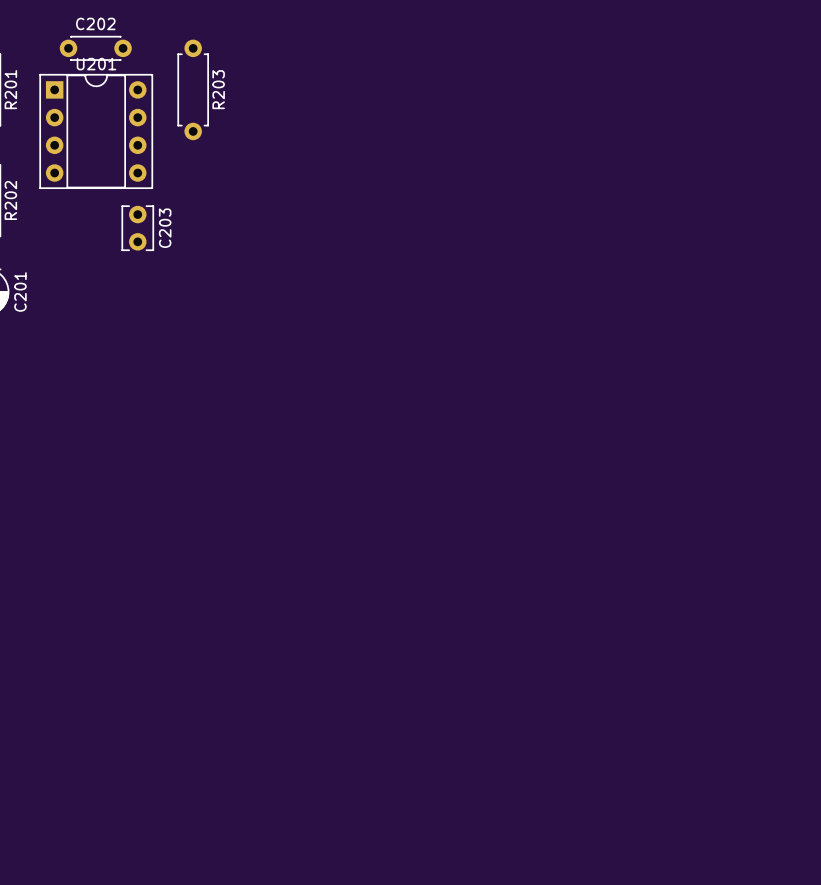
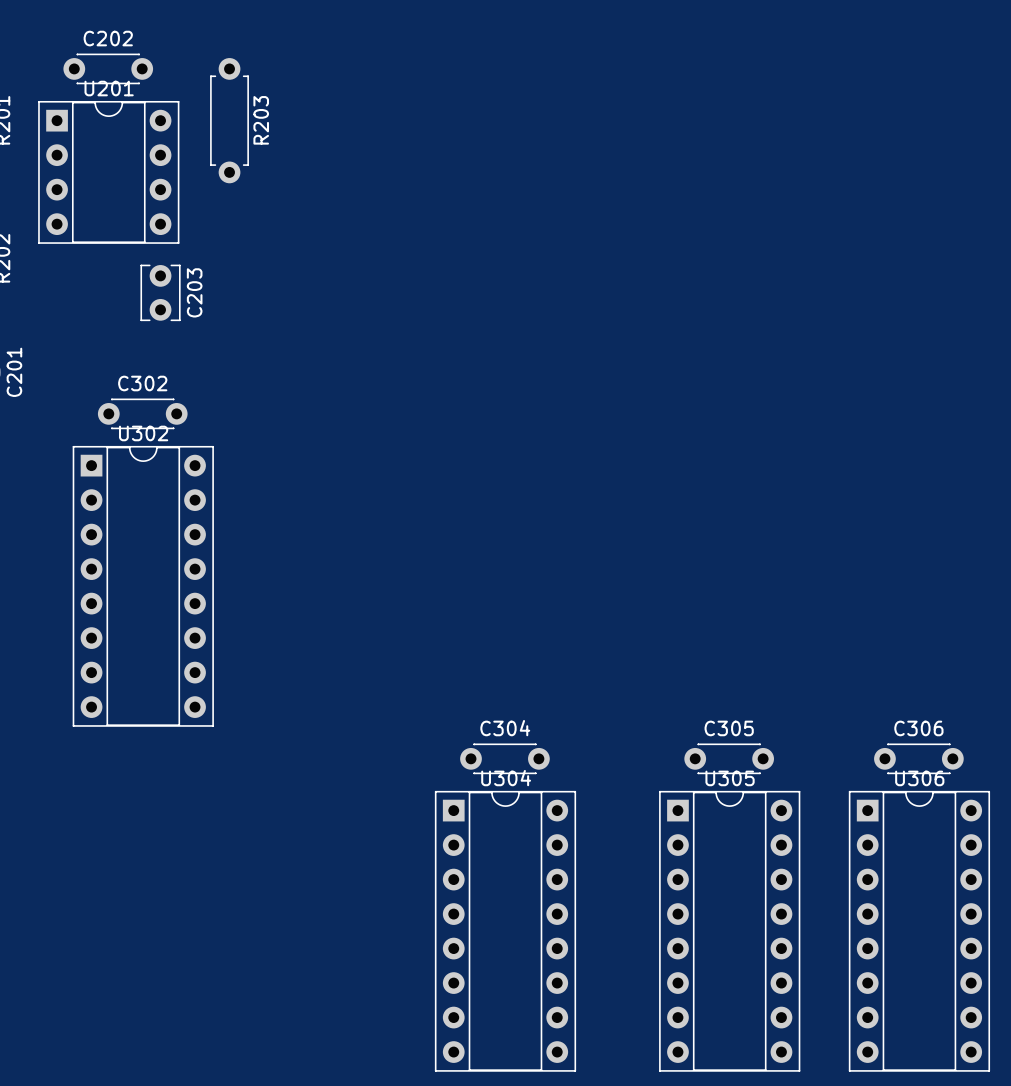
C302: none -> (142, 413)
U302: none -> (143, 586)
C304: none -> (504, 758)
C305: none -> (729, 758)
C306: none -> (918, 758)
U304: none -> (505, 931)
U305: none -> (729, 931)
U306: none -> (919, 931)

